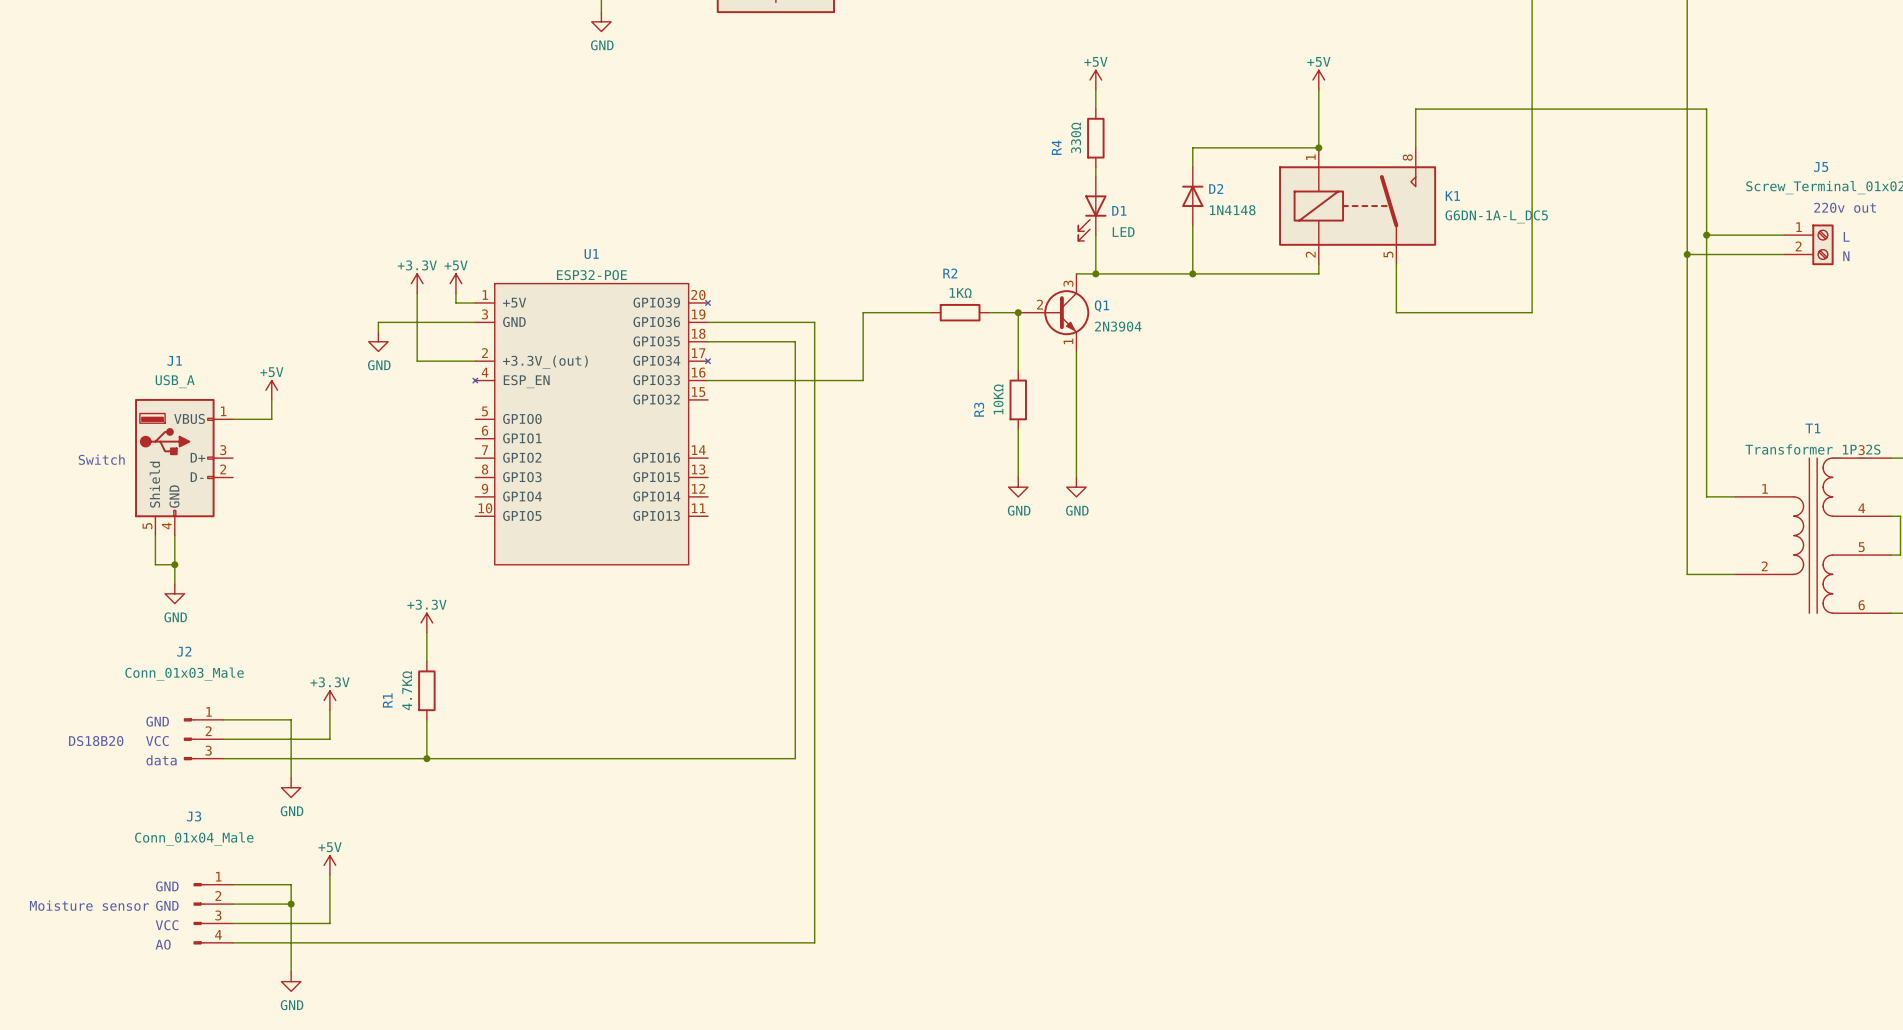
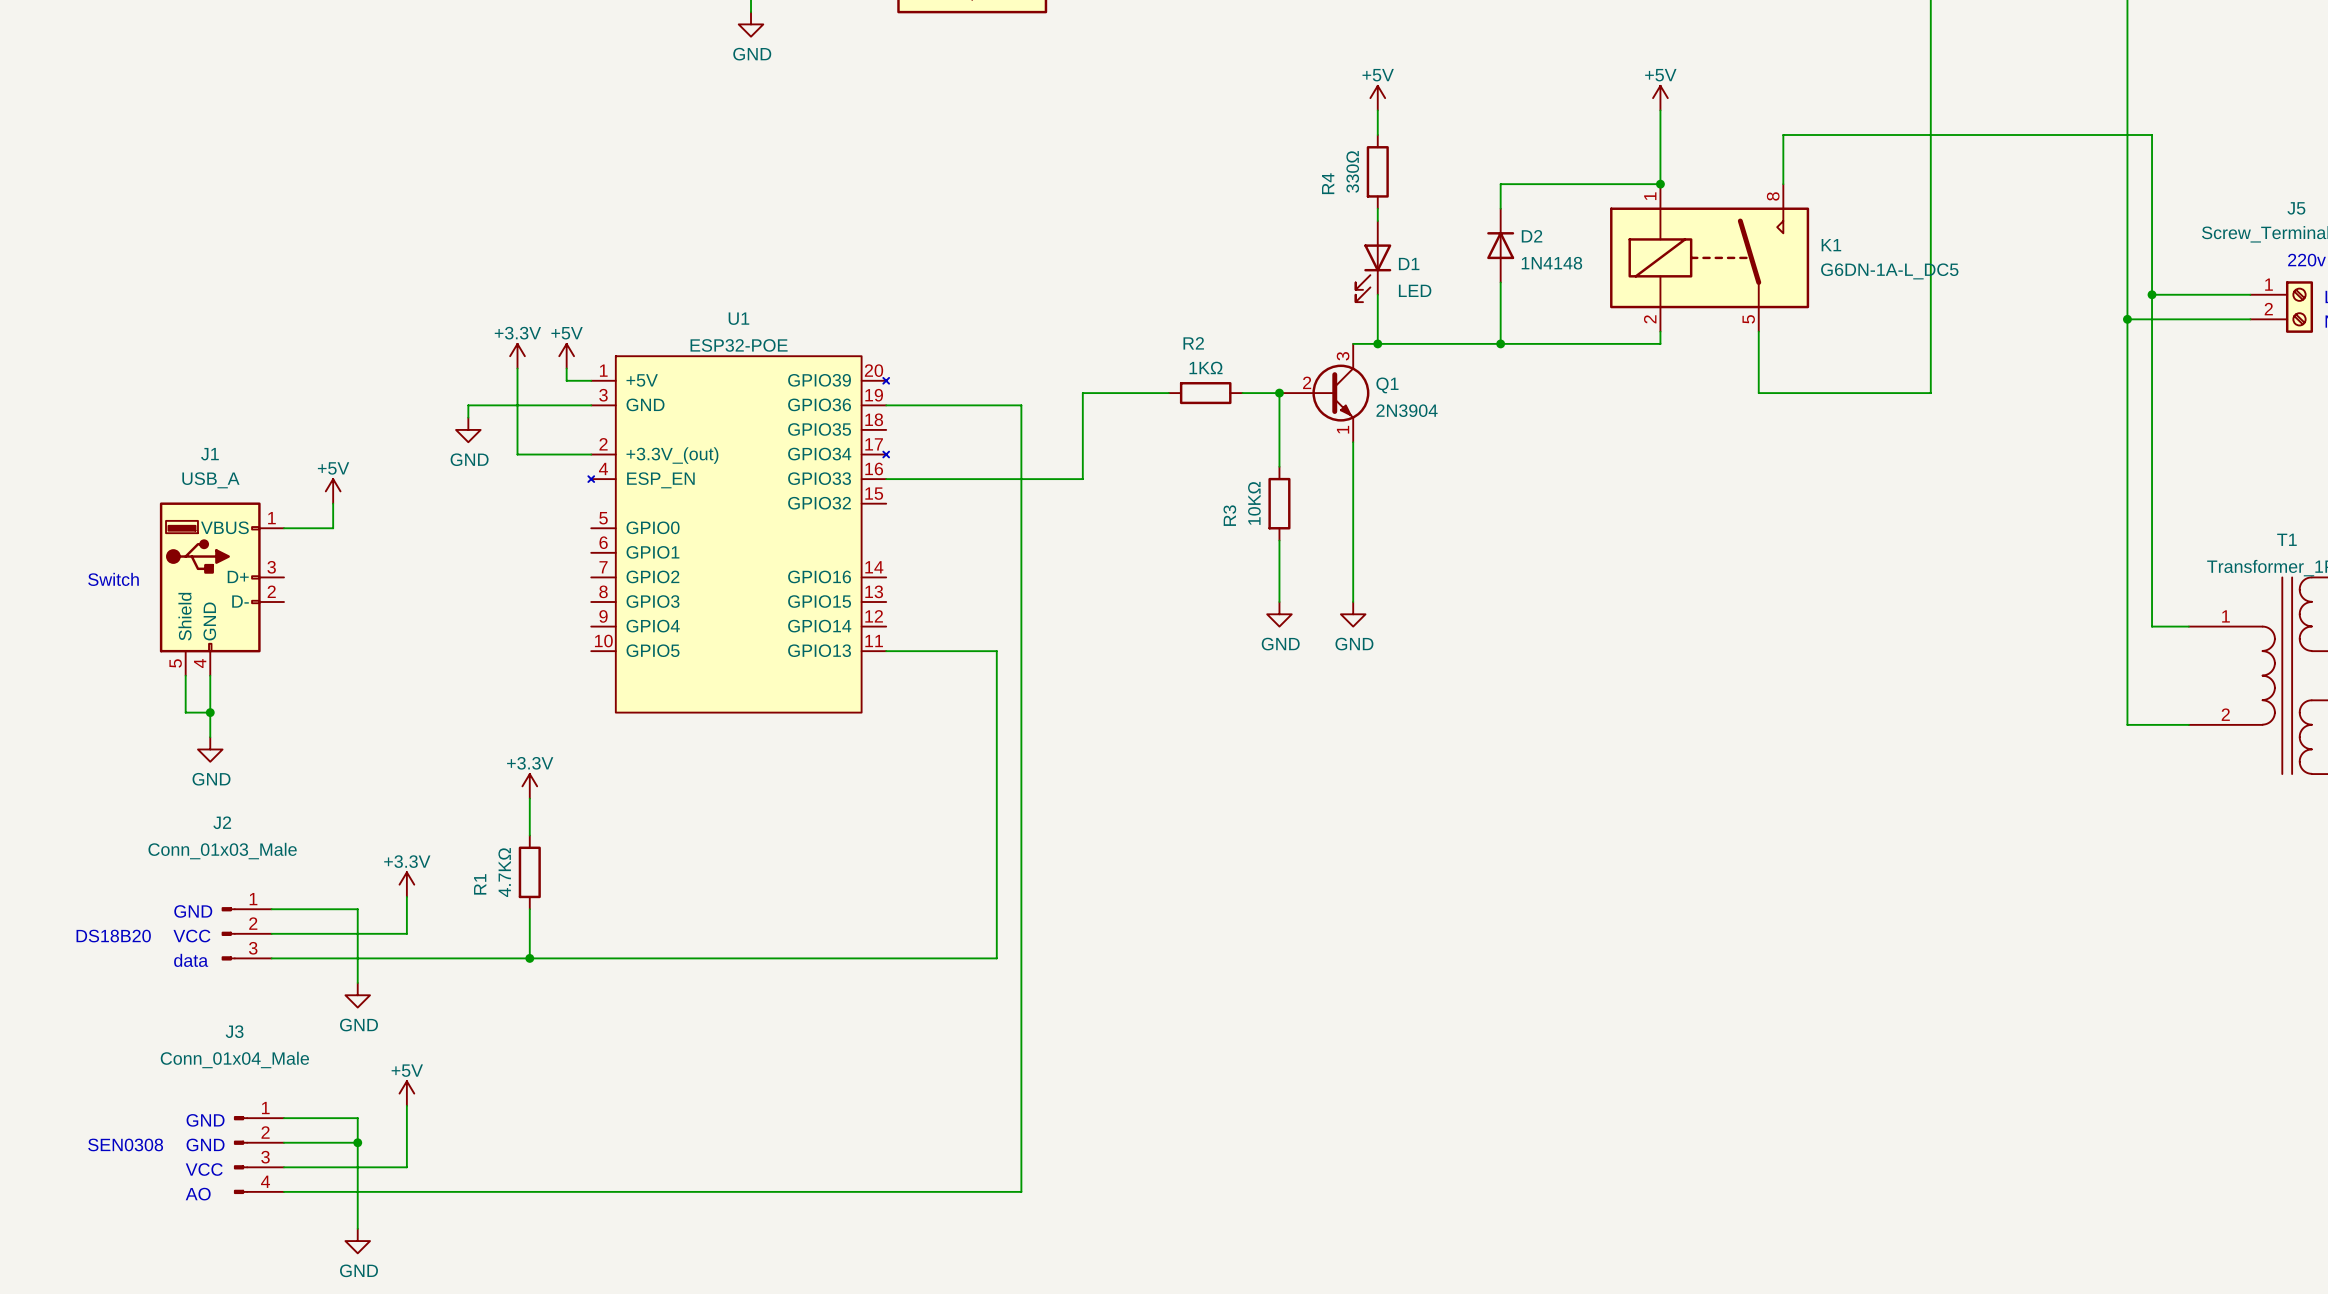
wire: (708, 341) (795, 341) (795, 516) -> (886, 651) (996, 651)
text: Moisture sensor (89, 905) -> none
text: none -> SEN0308 (125, 1144)

